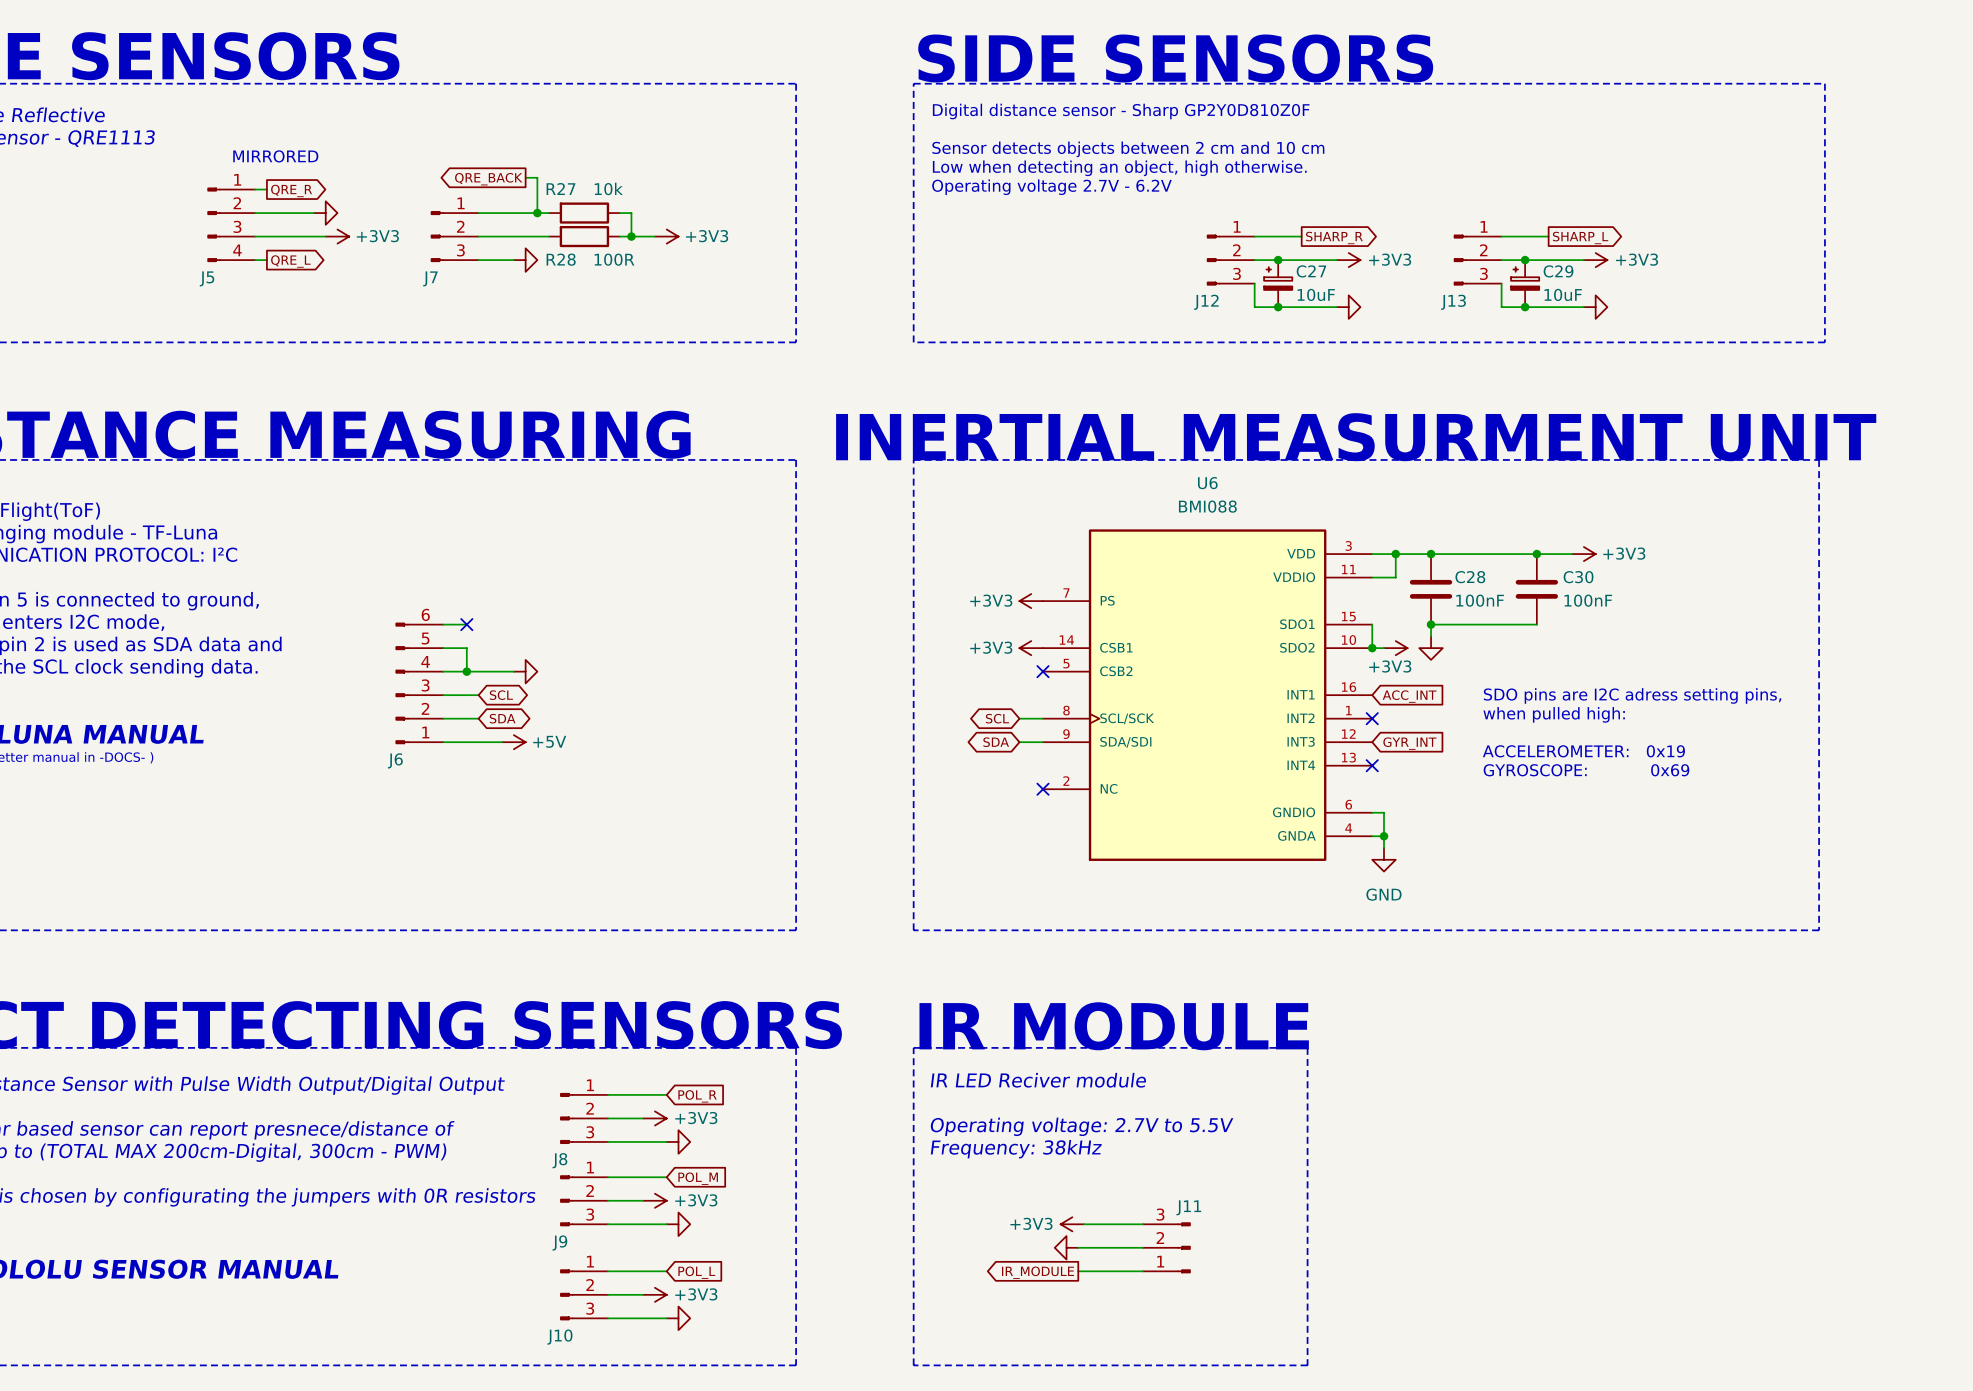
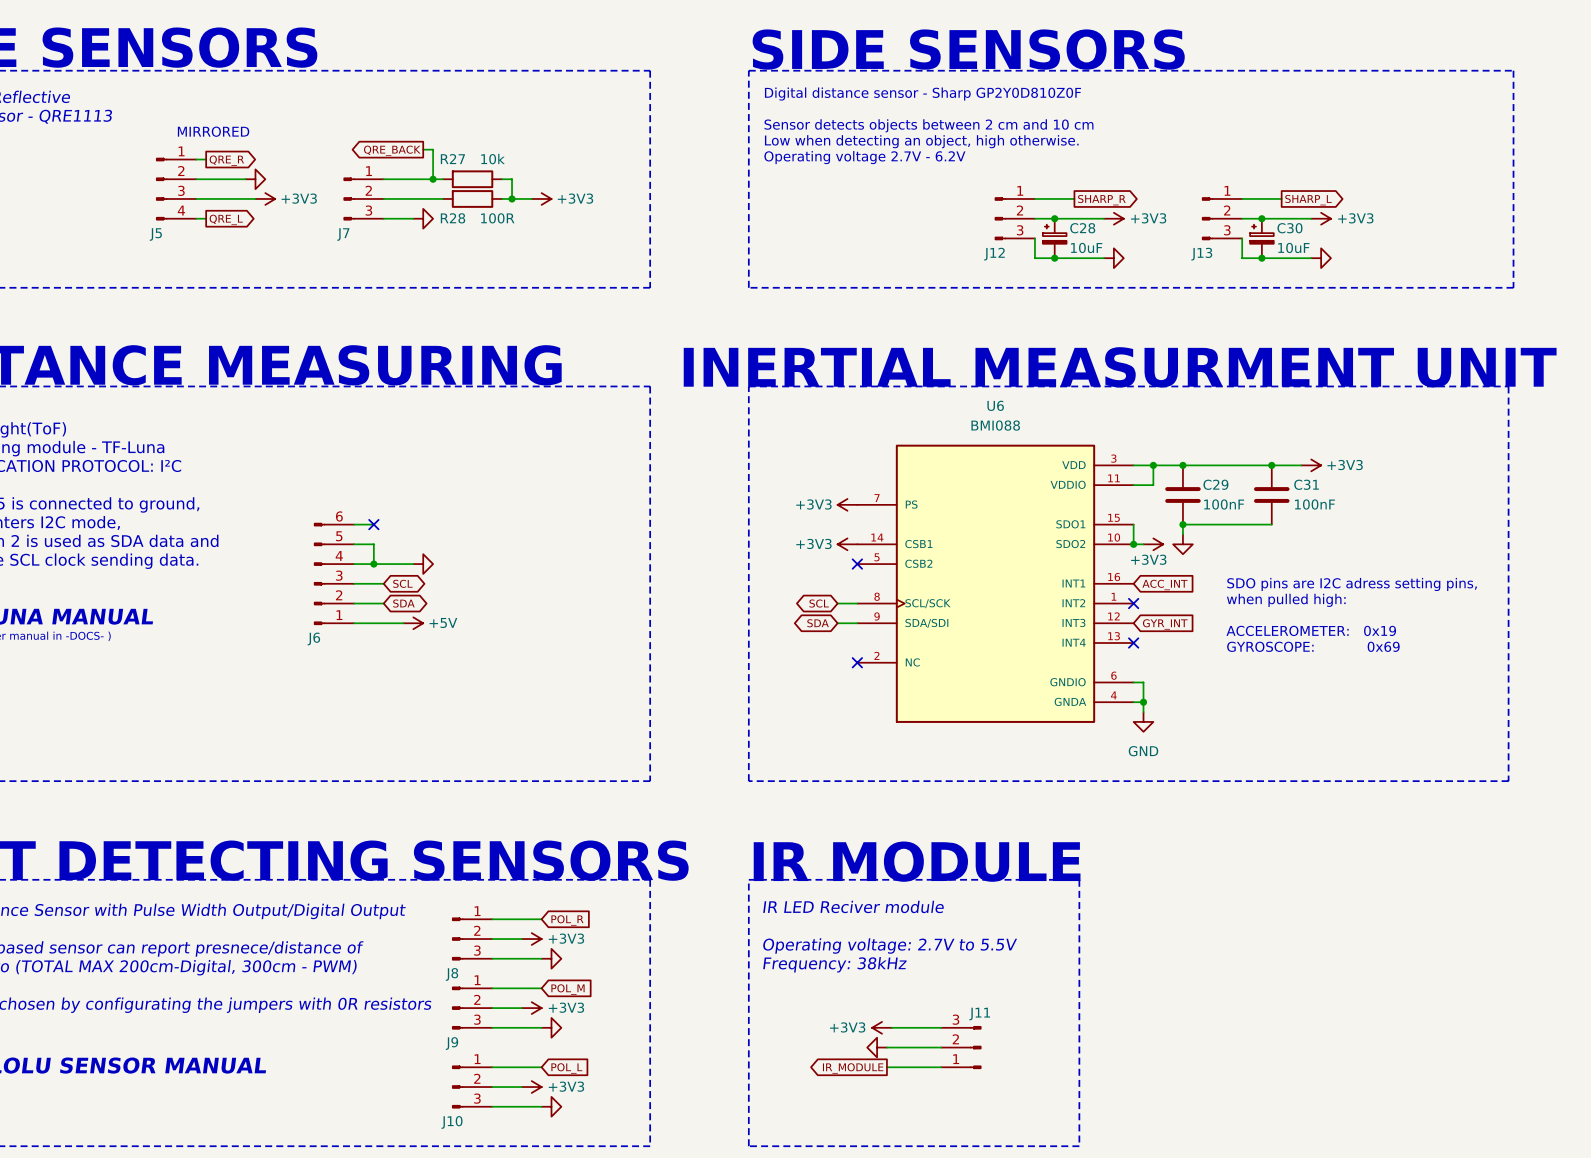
C27 name: C27 (1311, 271) -> C28 (1082, 228)
C29 name: C29 (1558, 271) -> C30 (1289, 228)
C28 name: C28 (1470, 577) -> C29 (1215, 484)
C30 name: C30 (1578, 577) -> C31 (1306, 484)

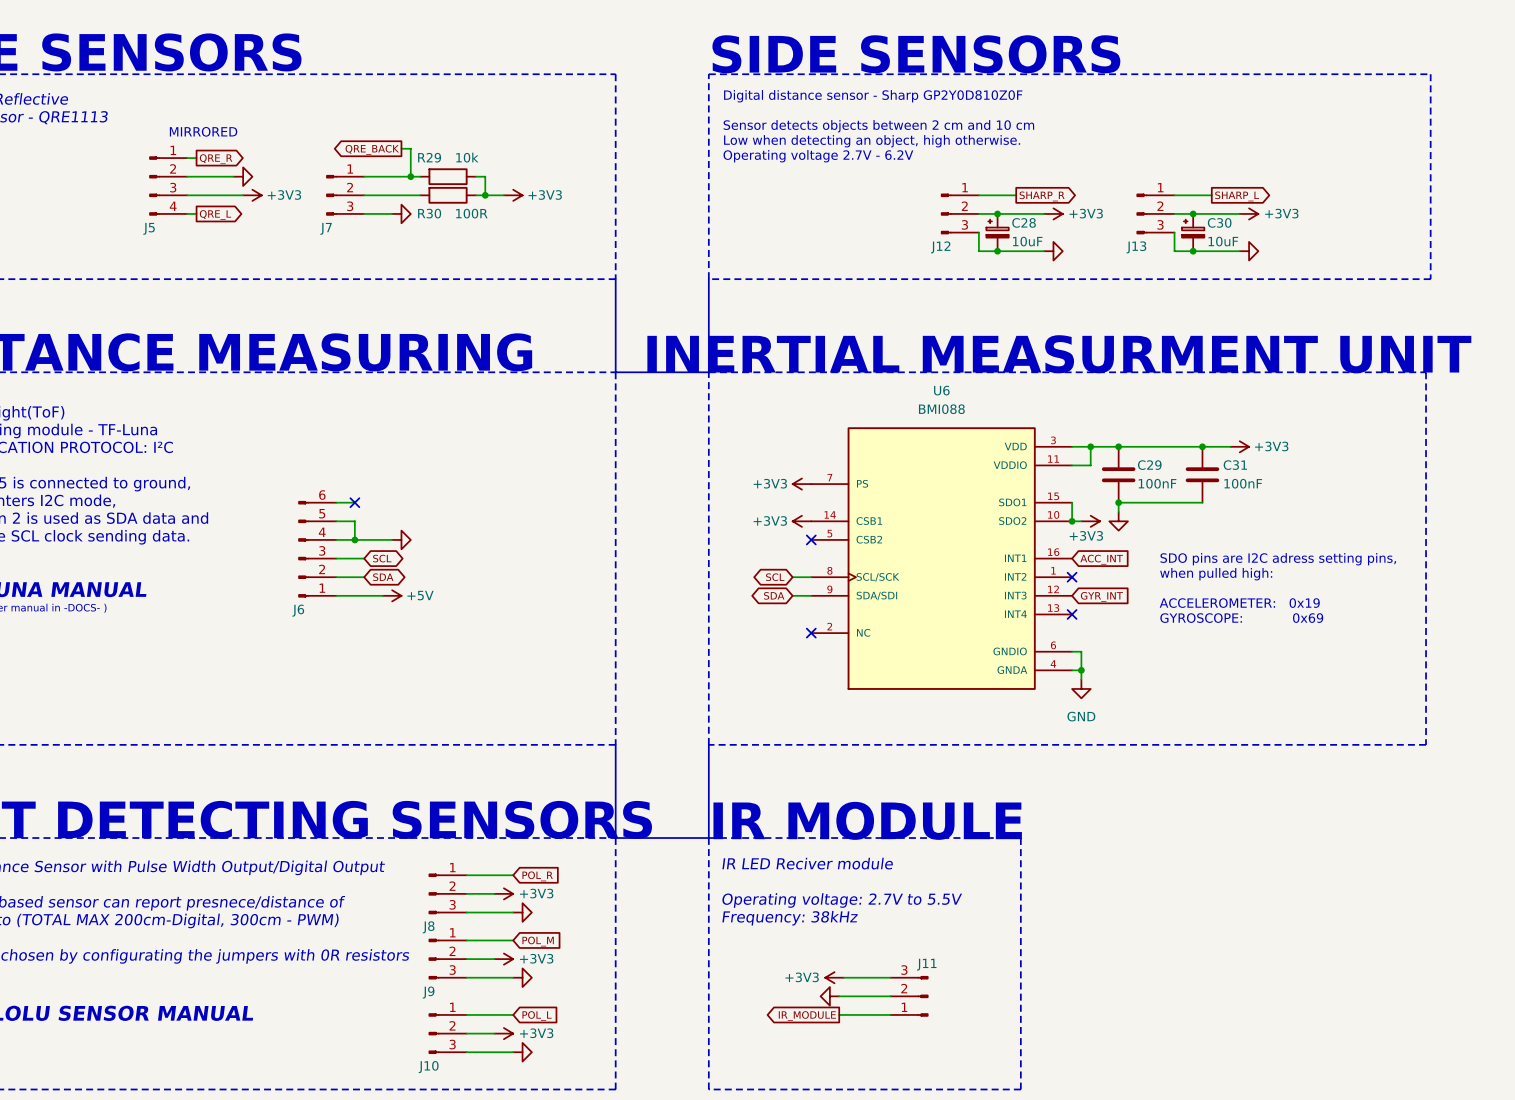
R27 name: R27 (452, 159) -> R29 (429, 157)
R28 name: R28 (453, 218) -> R30 (429, 213)
line: none -> (615, 279) (615, 372) (708, 372) (708, 279)
line: none -> (615, 744) (615, 838) (708, 838) (708, 744)

